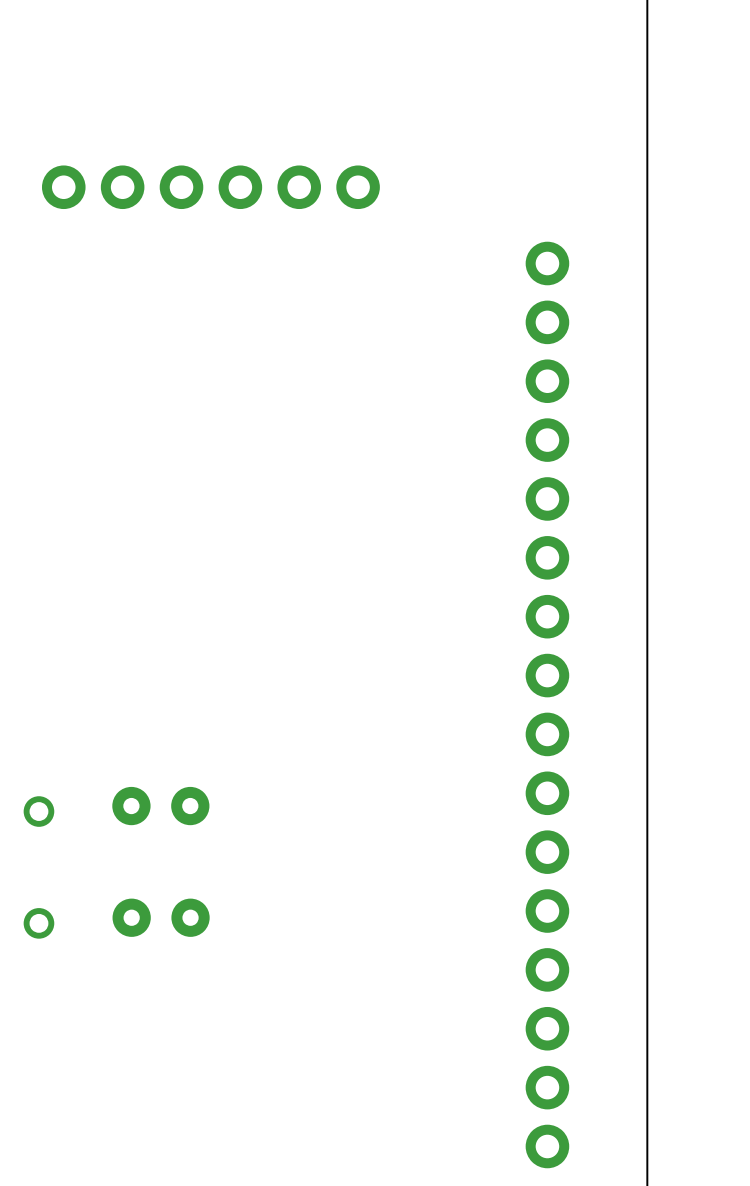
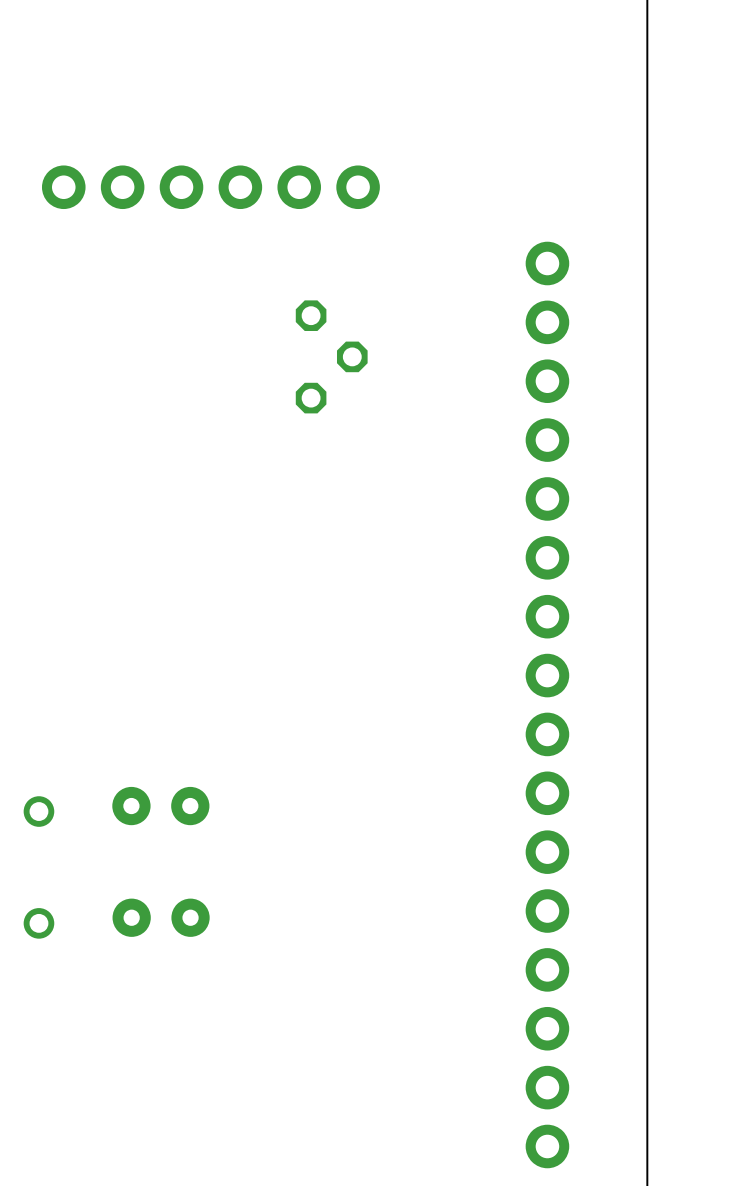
part: none -> (331, 356)

